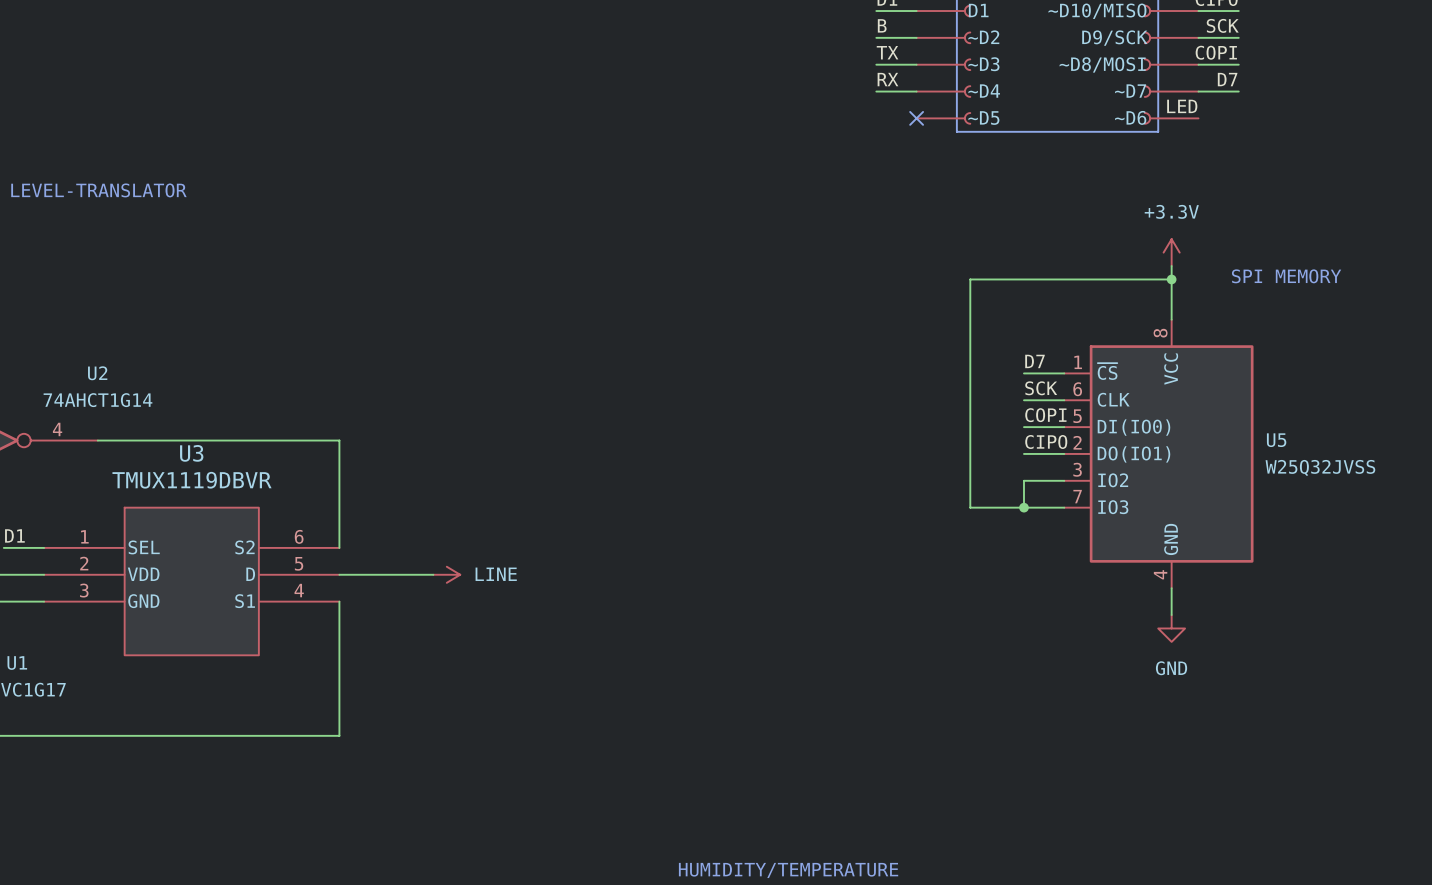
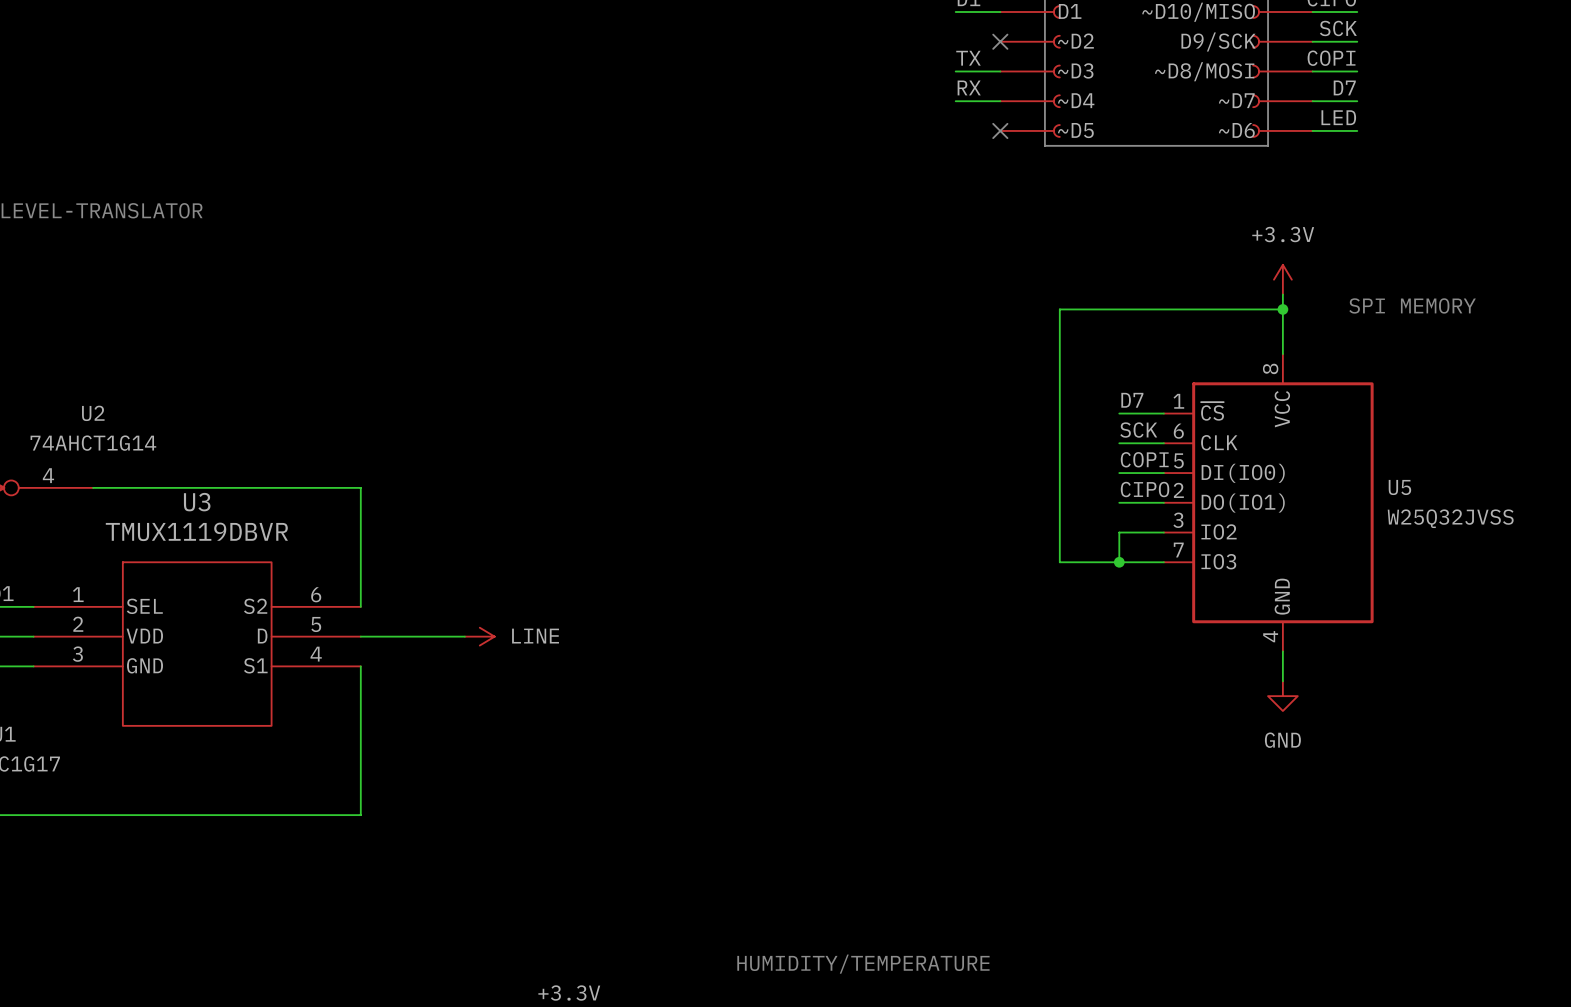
label: B (882, 25) -> none
wire: (876, 37) (916, 37) -> none
no-connect mark: none -> (1000, 41)
label position: LED (1182, 106) -> LED (1338, 117)
wire: none -> (1312, 130) (1357, 130)

